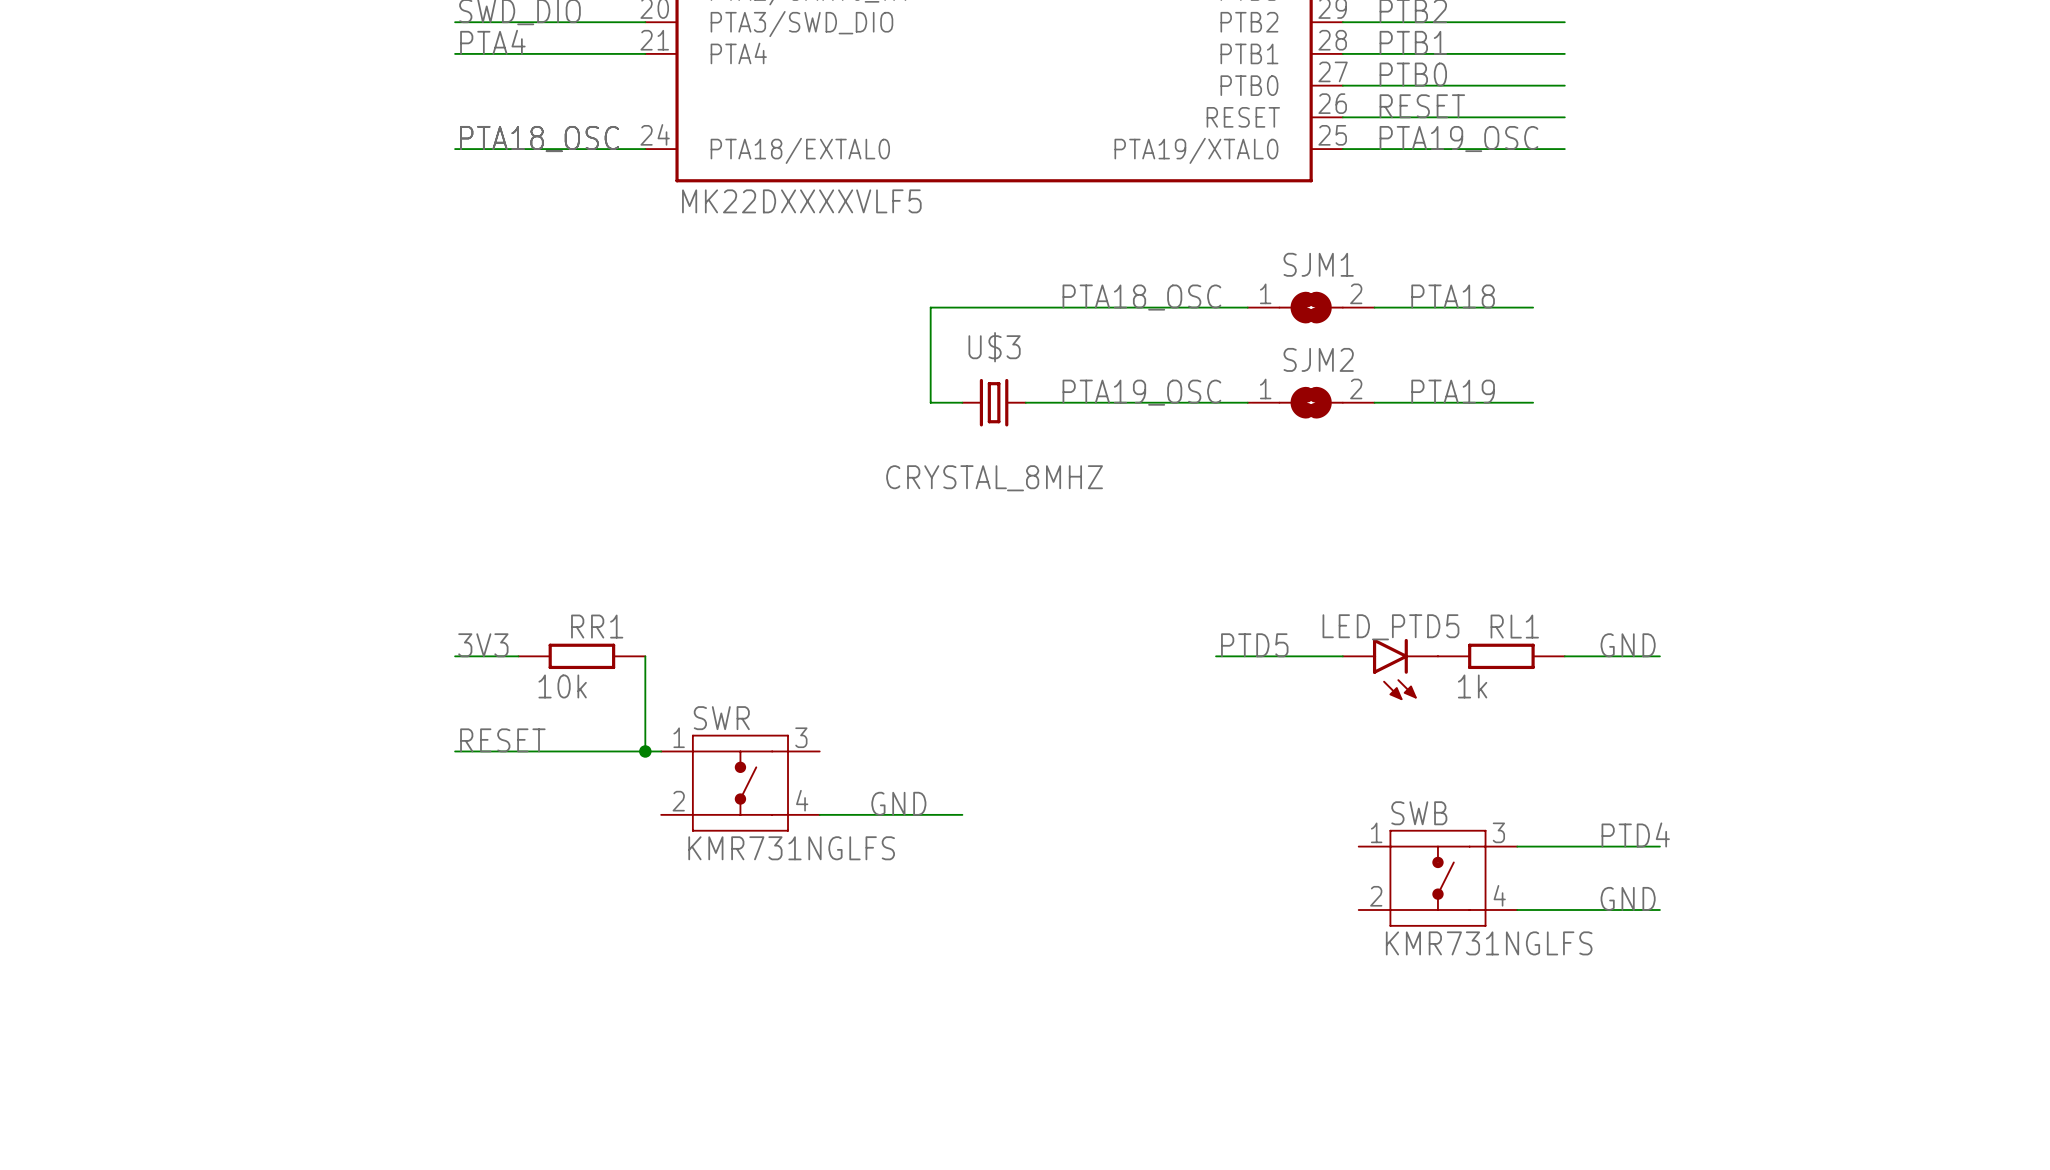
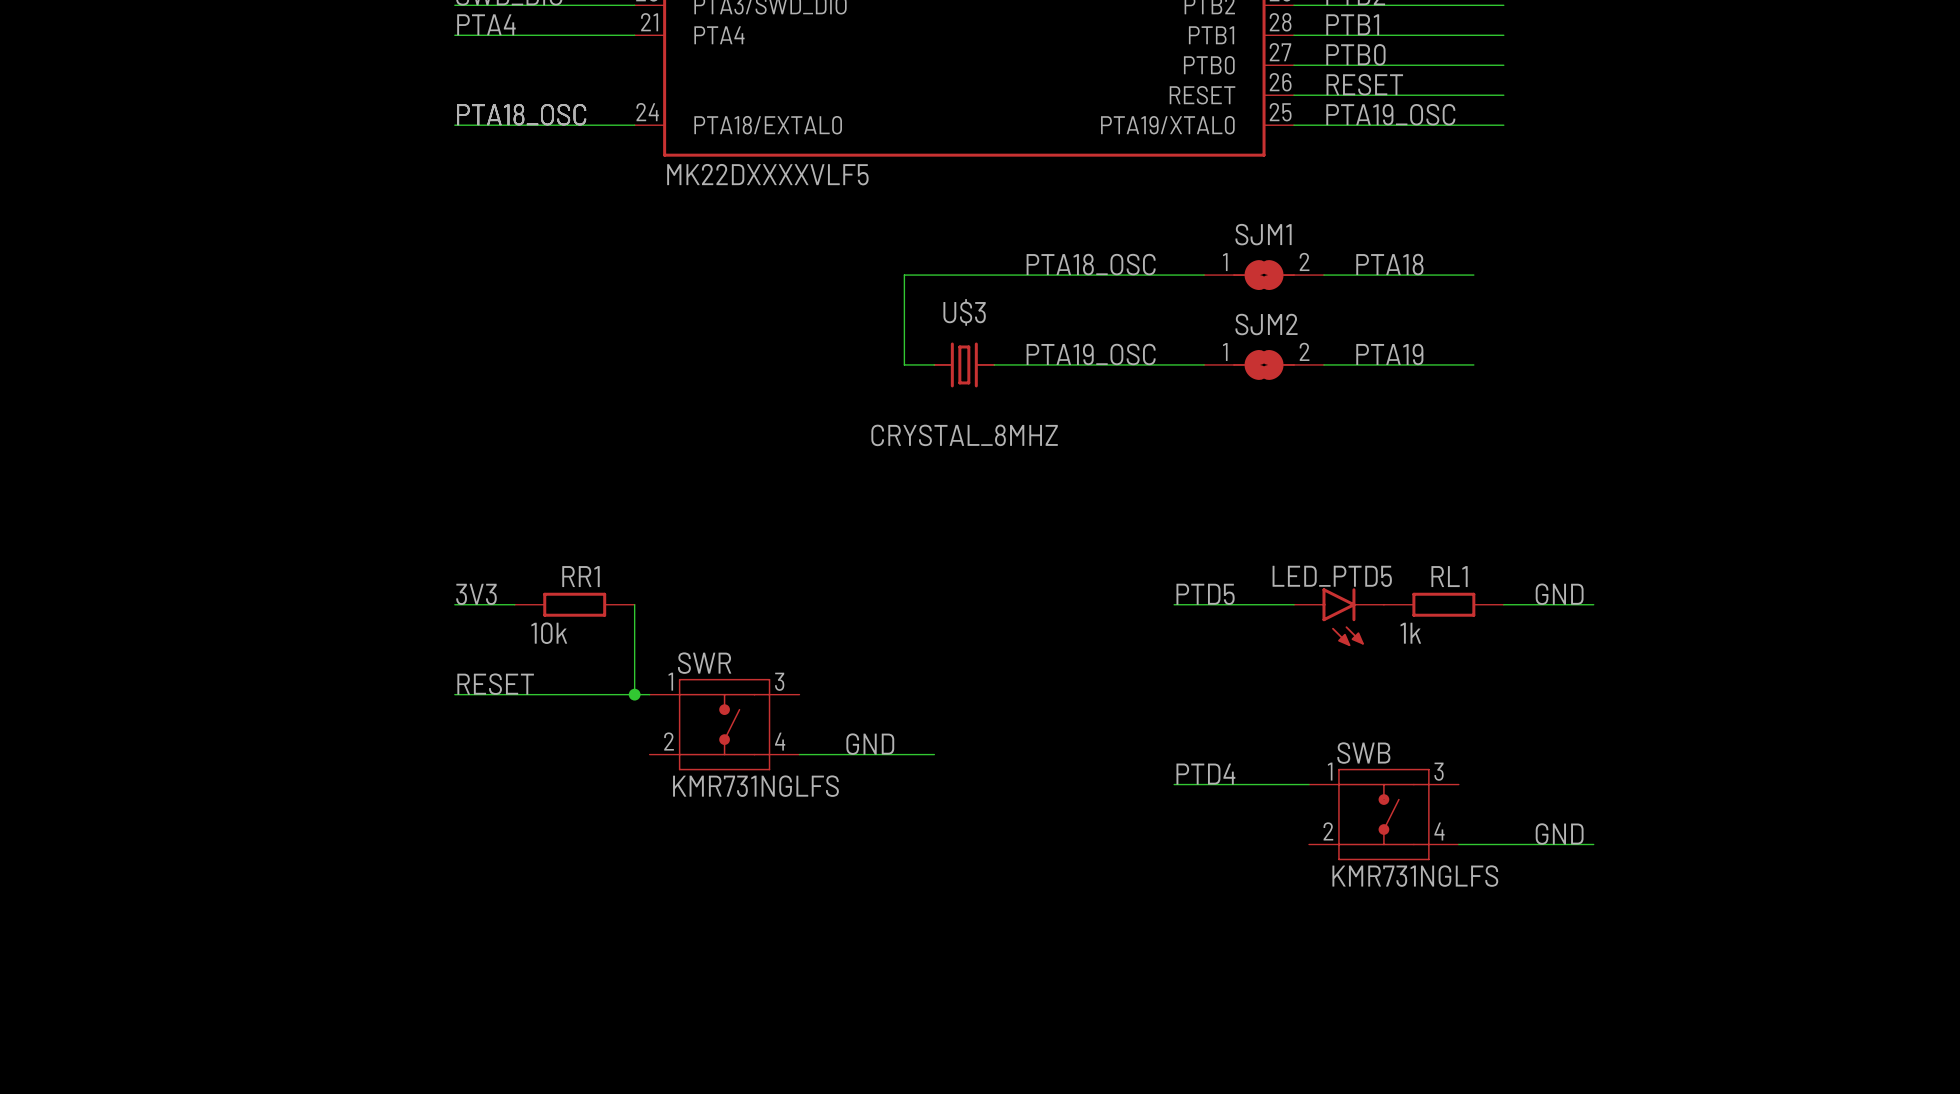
label: none -> PTD4 (1205, 774)
label: PTD4 (1635, 834) -> none
wire: (1517, 846) (1659, 846) -> (1174, 784) (1308, 784)

